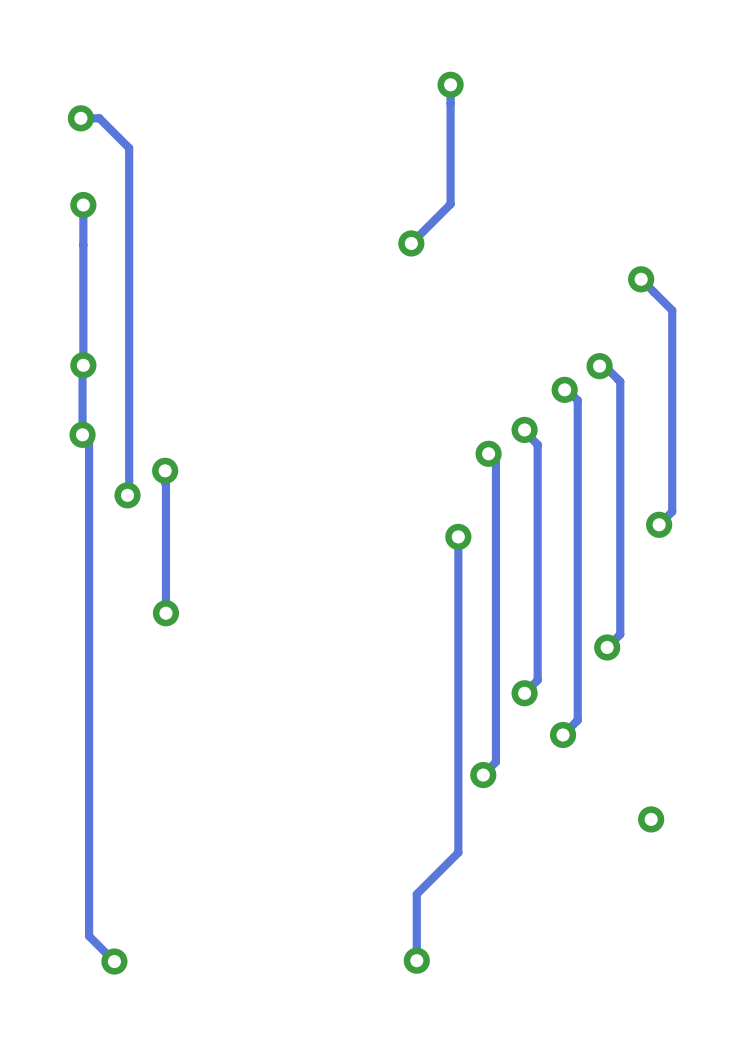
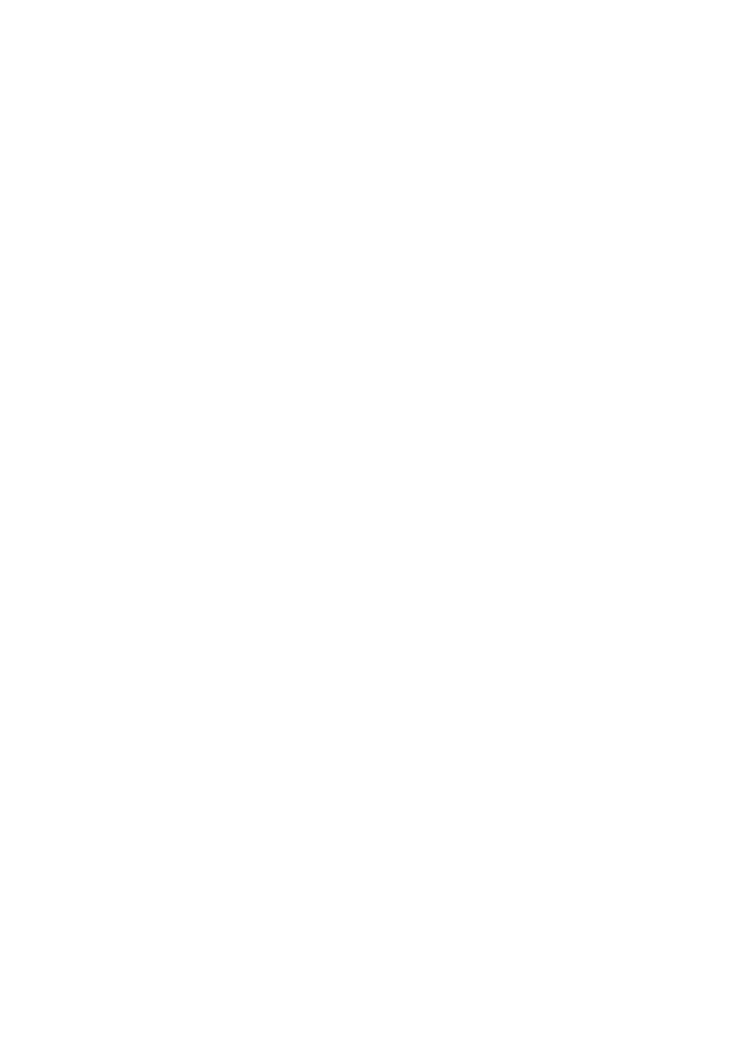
track: (450, 84) (450, 204) (411, 243) -> none
via: (450, 84) -> none
track: (80, 118) (99, 118) (129, 148) (129, 482) -> none
via: (80, 118) -> none
track: (83, 205) (82, 434) -> none
via: (83, 205) -> none
via: (411, 243) -> none
track: (641, 279) (672, 310) (672, 511) (659, 524) -> none
via: (641, 279) -> none
via: (83, 365) -> none
via: (599, 366) -> none
track: (604, 366) (620, 381) (620, 634) (607, 647) -> none
track: (564, 387) (577, 400) (577, 720) (563, 734) -> none
via: (564, 389) -> none
via: (524, 429) -> none
track: (524, 431) (537, 444) (537, 680) (524, 693) -> none
via: (82, 434) -> none
track: (89, 435) (89, 936) (114, 961) -> none
track: (486, 452) (495, 461) (495, 761) (482, 775) -> none
via: (488, 453) -> none
track: (165, 470) (165, 613) -> none
via: (165, 470) -> none
via: (127, 495) -> none
via: (659, 524) -> none
track: (458, 536) (458, 852) (416, 894) (416, 960) -> none
via: (458, 536) -> none
via: (165, 613) -> none
via: (607, 647) -> none
via: (524, 693) -> none
via: (563, 734) -> none
via: (483, 775) -> none
via: (651, 819) -> none
via: (416, 960) -> none
via: (114, 961) -> none

